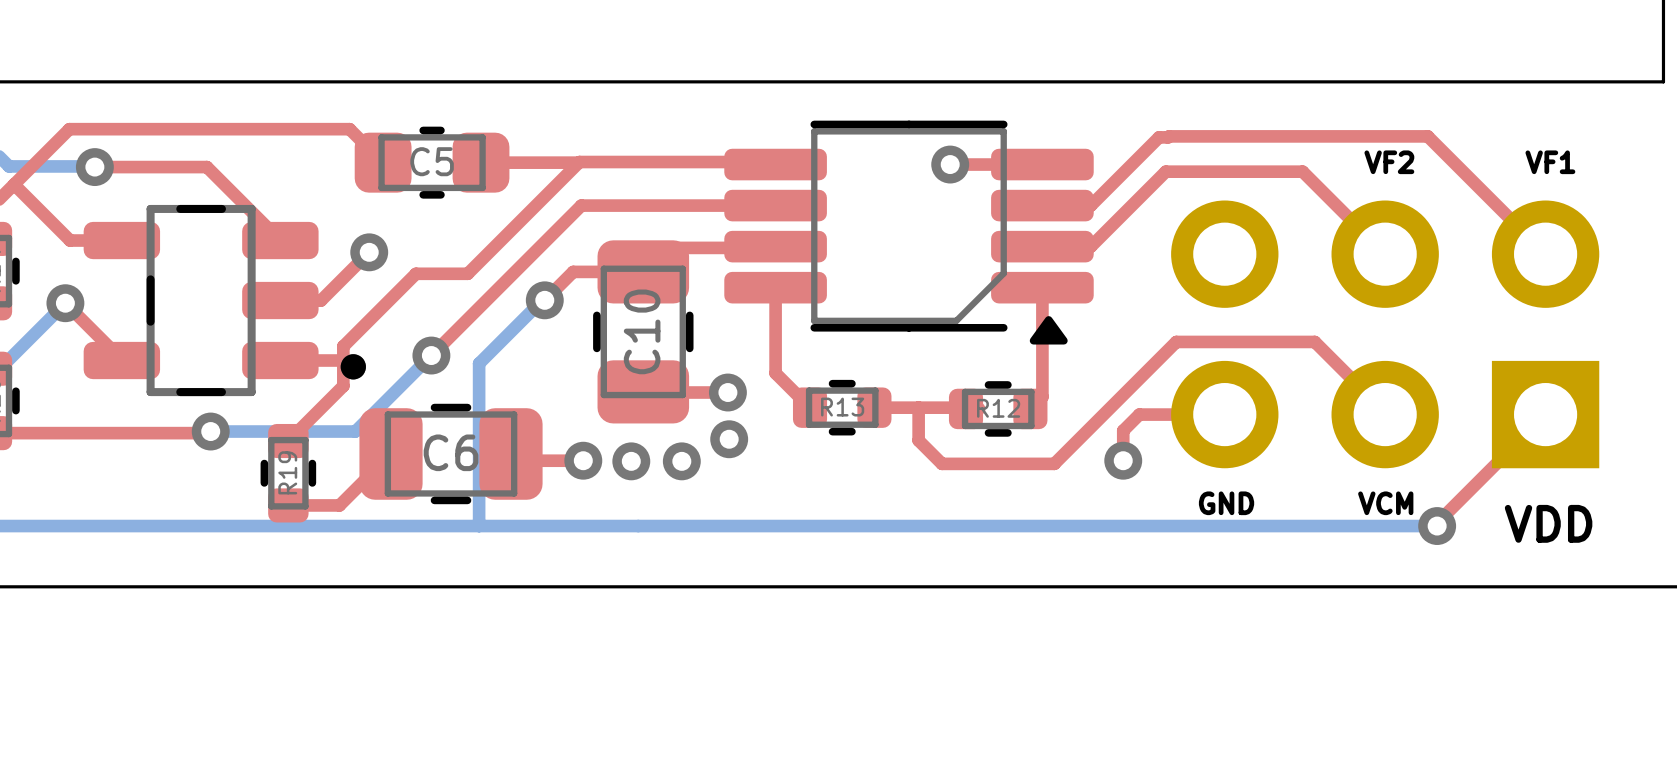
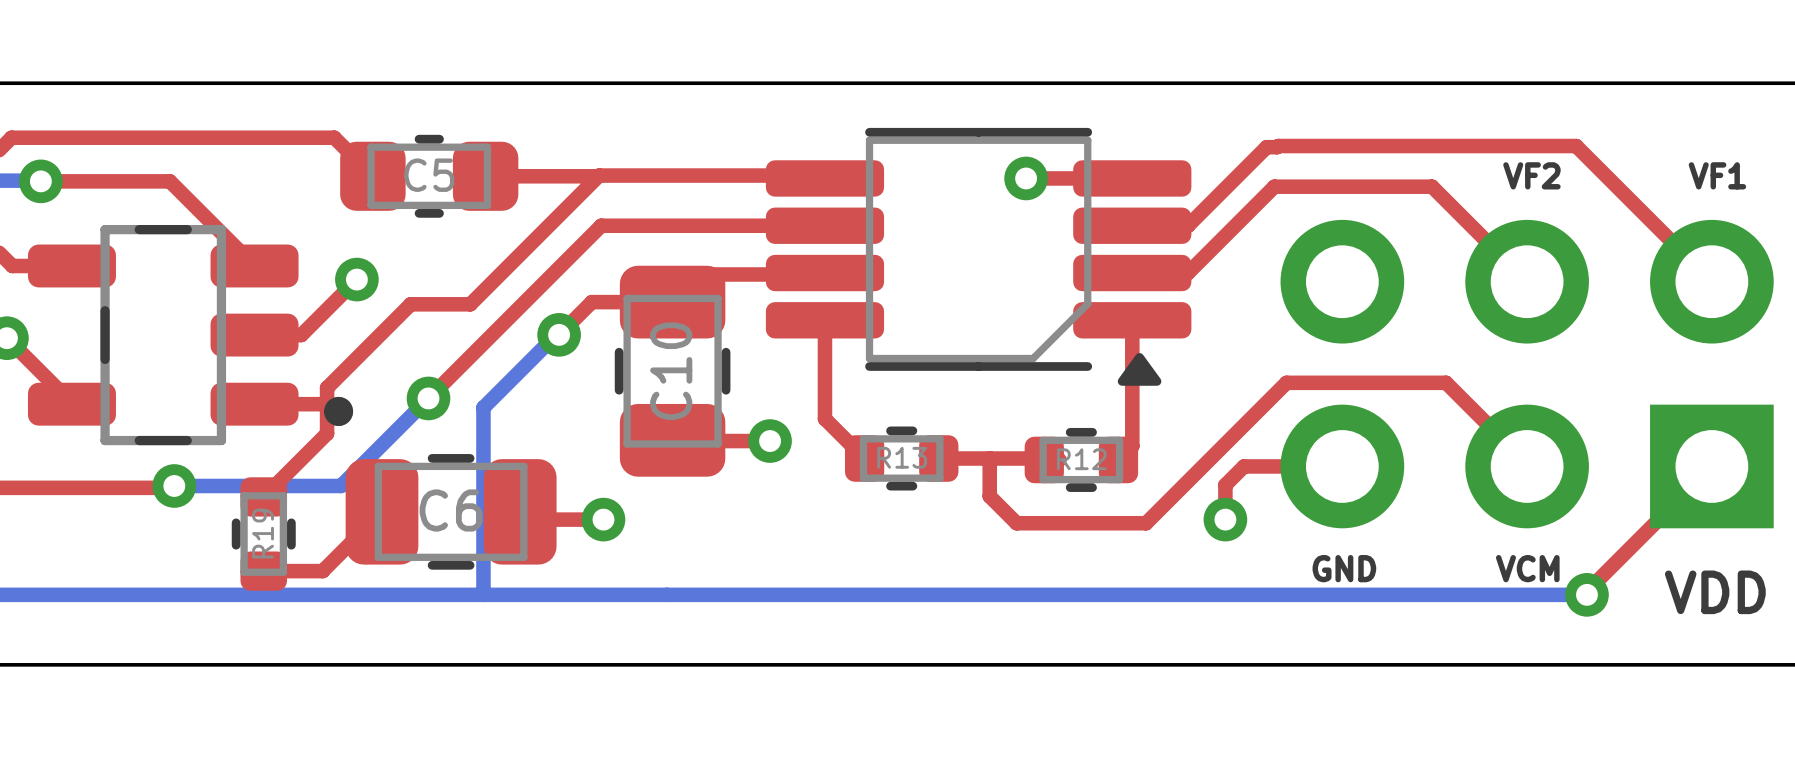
via: (729, 439) -> none
via: (631, 461) -> none
via: (681, 461) -> none

